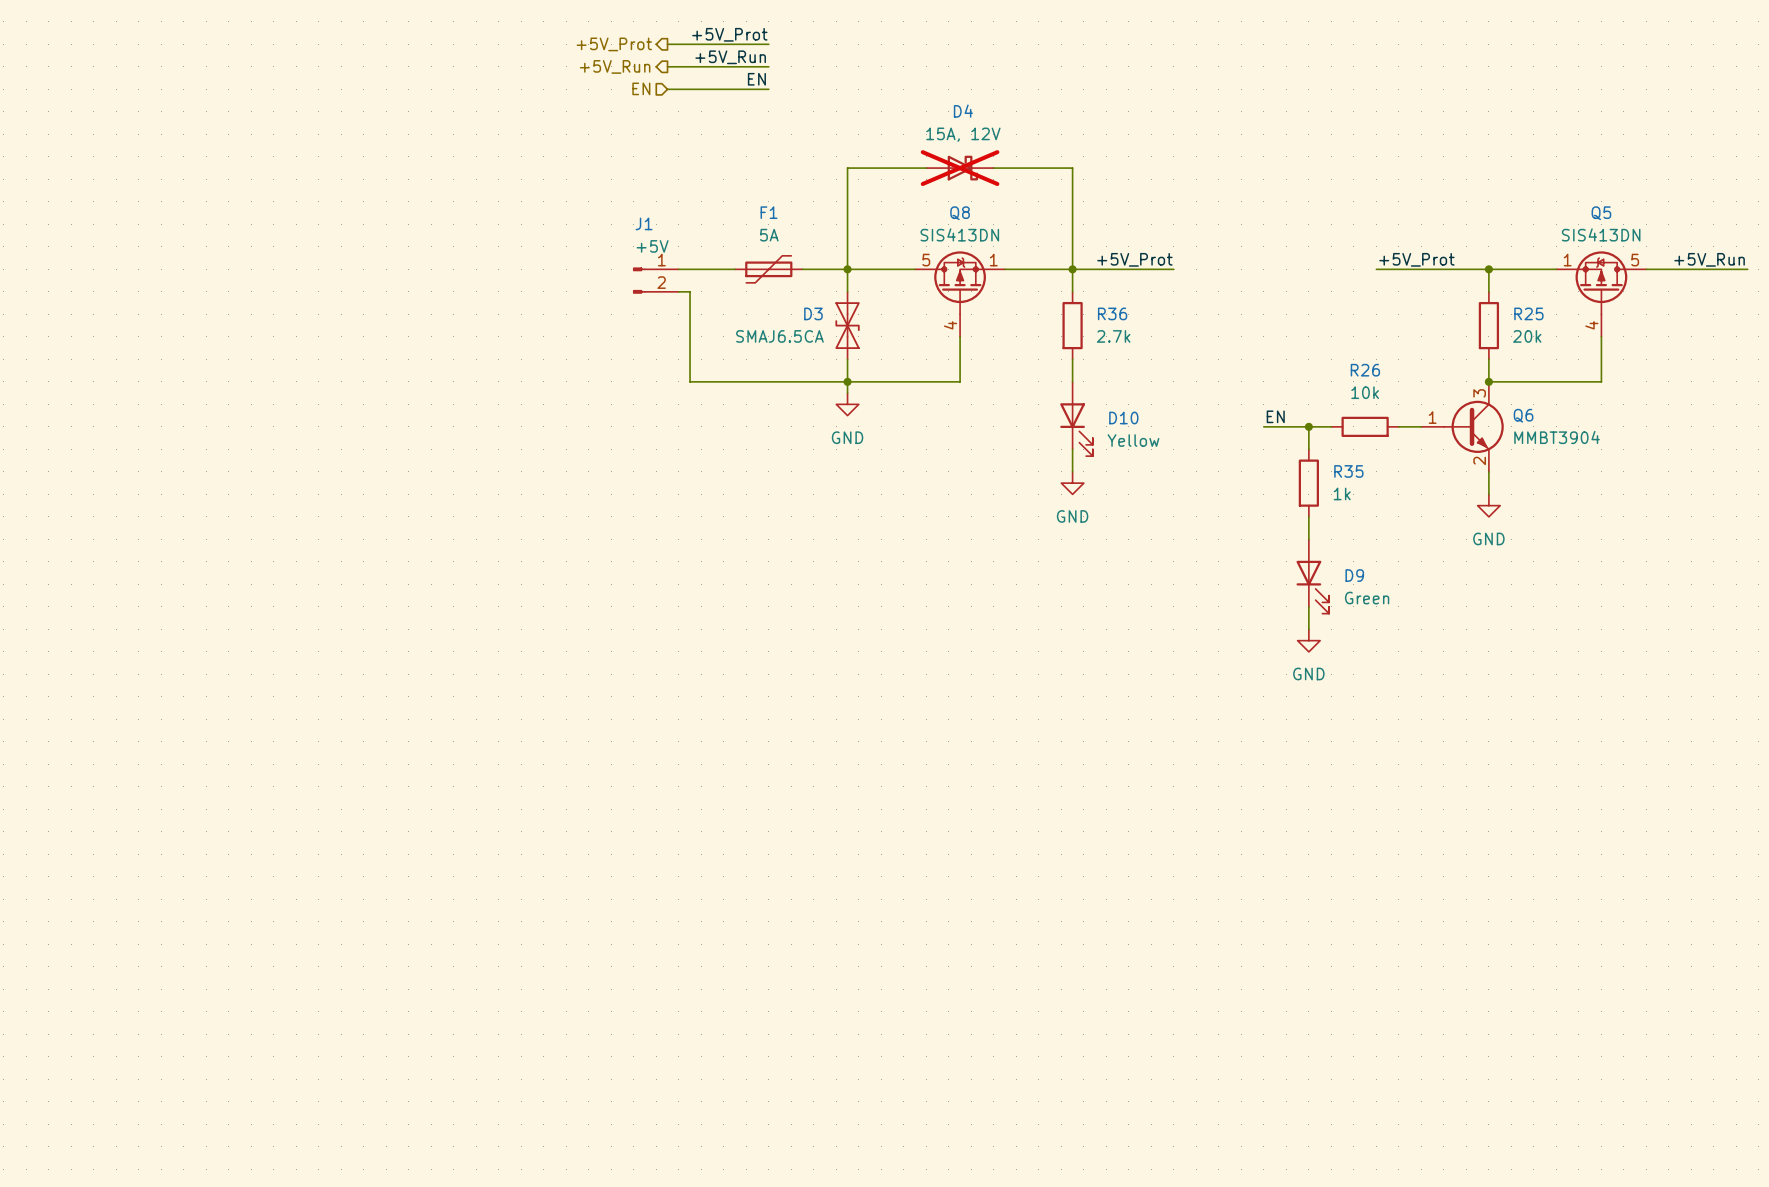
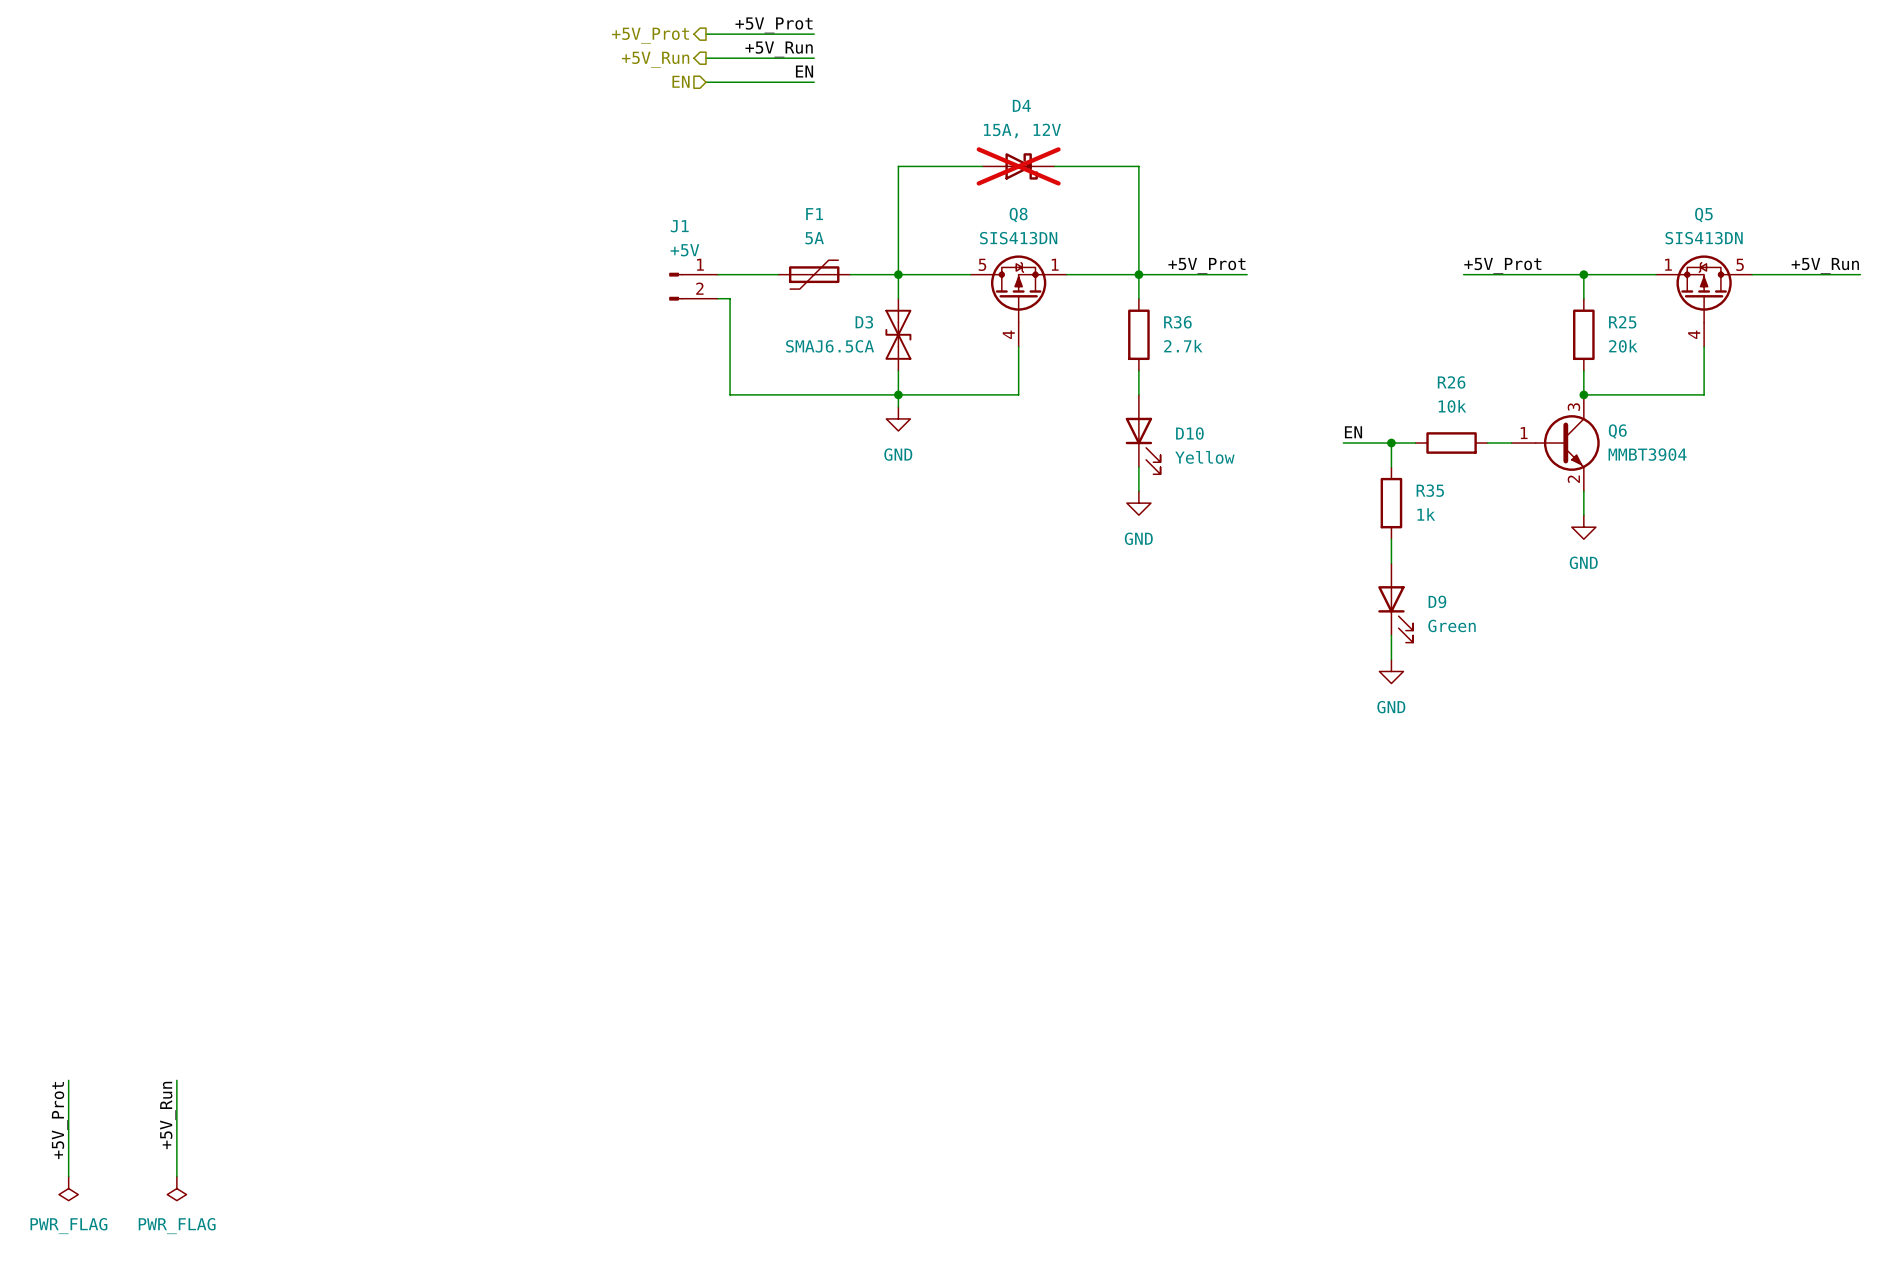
wire: none -> (68, 1080) (68, 1176)
wire: none -> (176, 1080) (176, 1176)
label: none -> +5V_Run (168, 1115)
label: none -> +5V_Prot (59, 1120)
power symbol: none -> PWR_FLAG (68, 1188)
power symbol: none -> PWR_FLAG (176, 1188)

